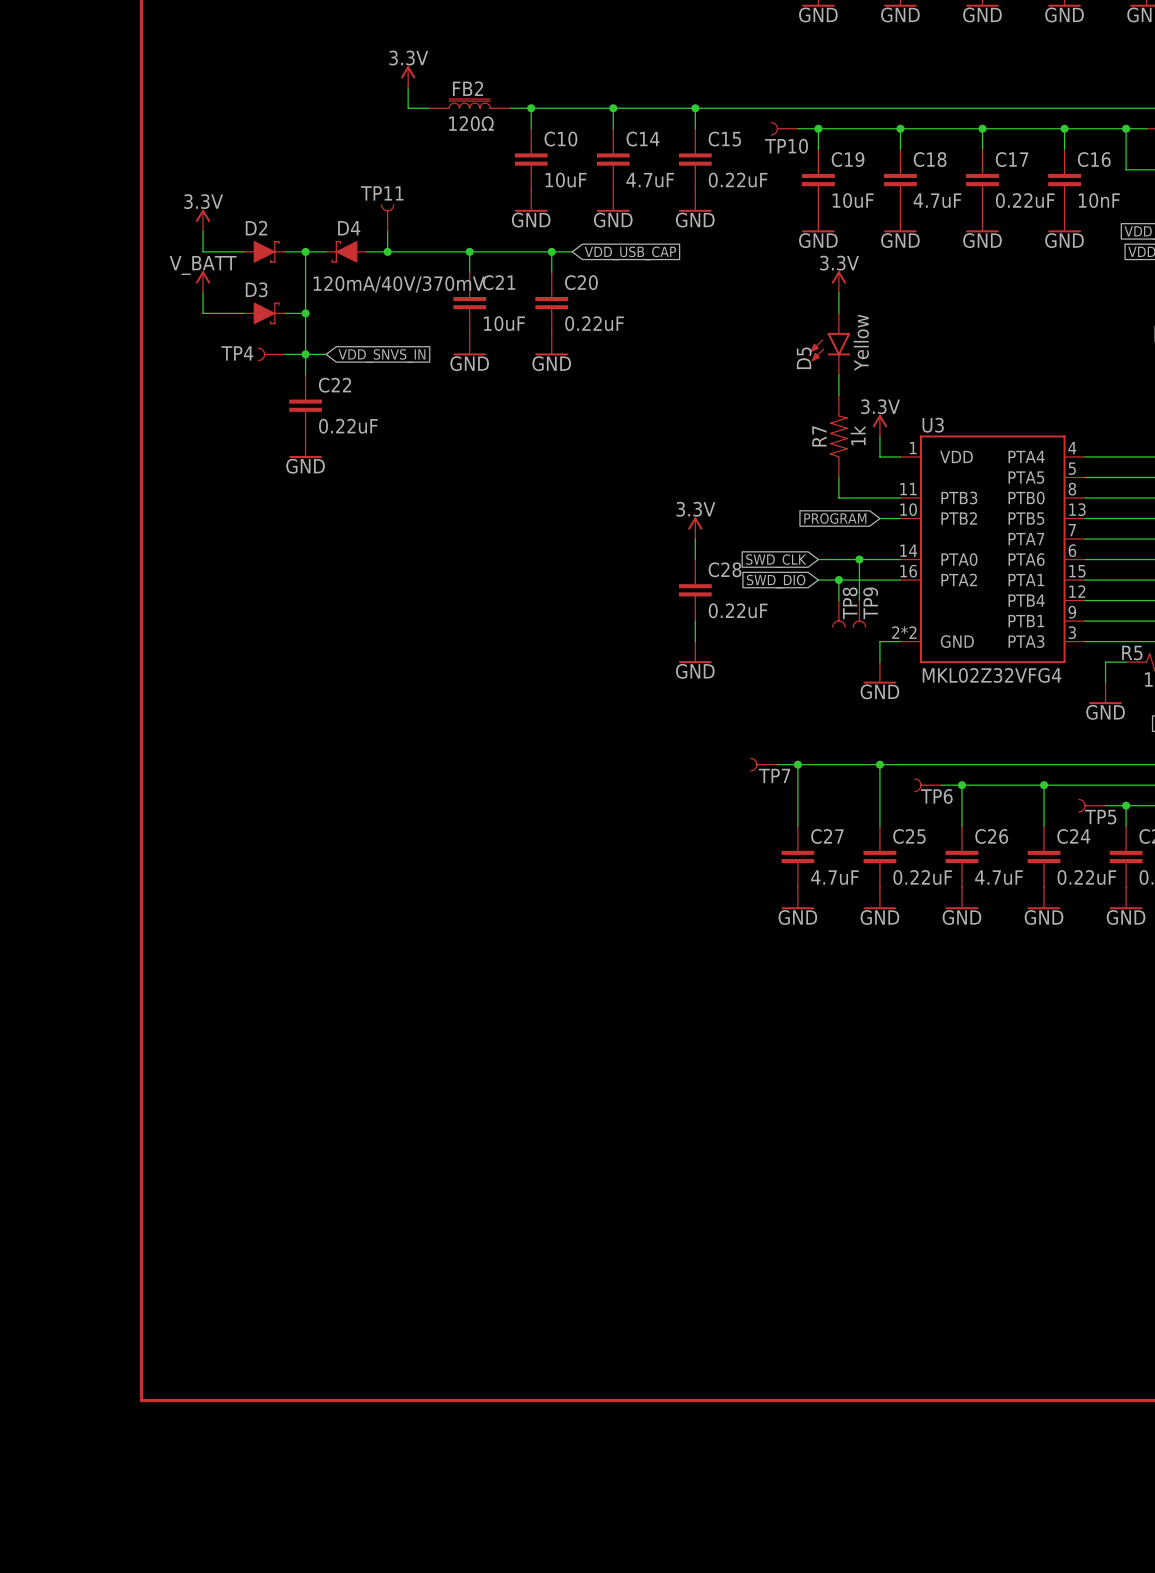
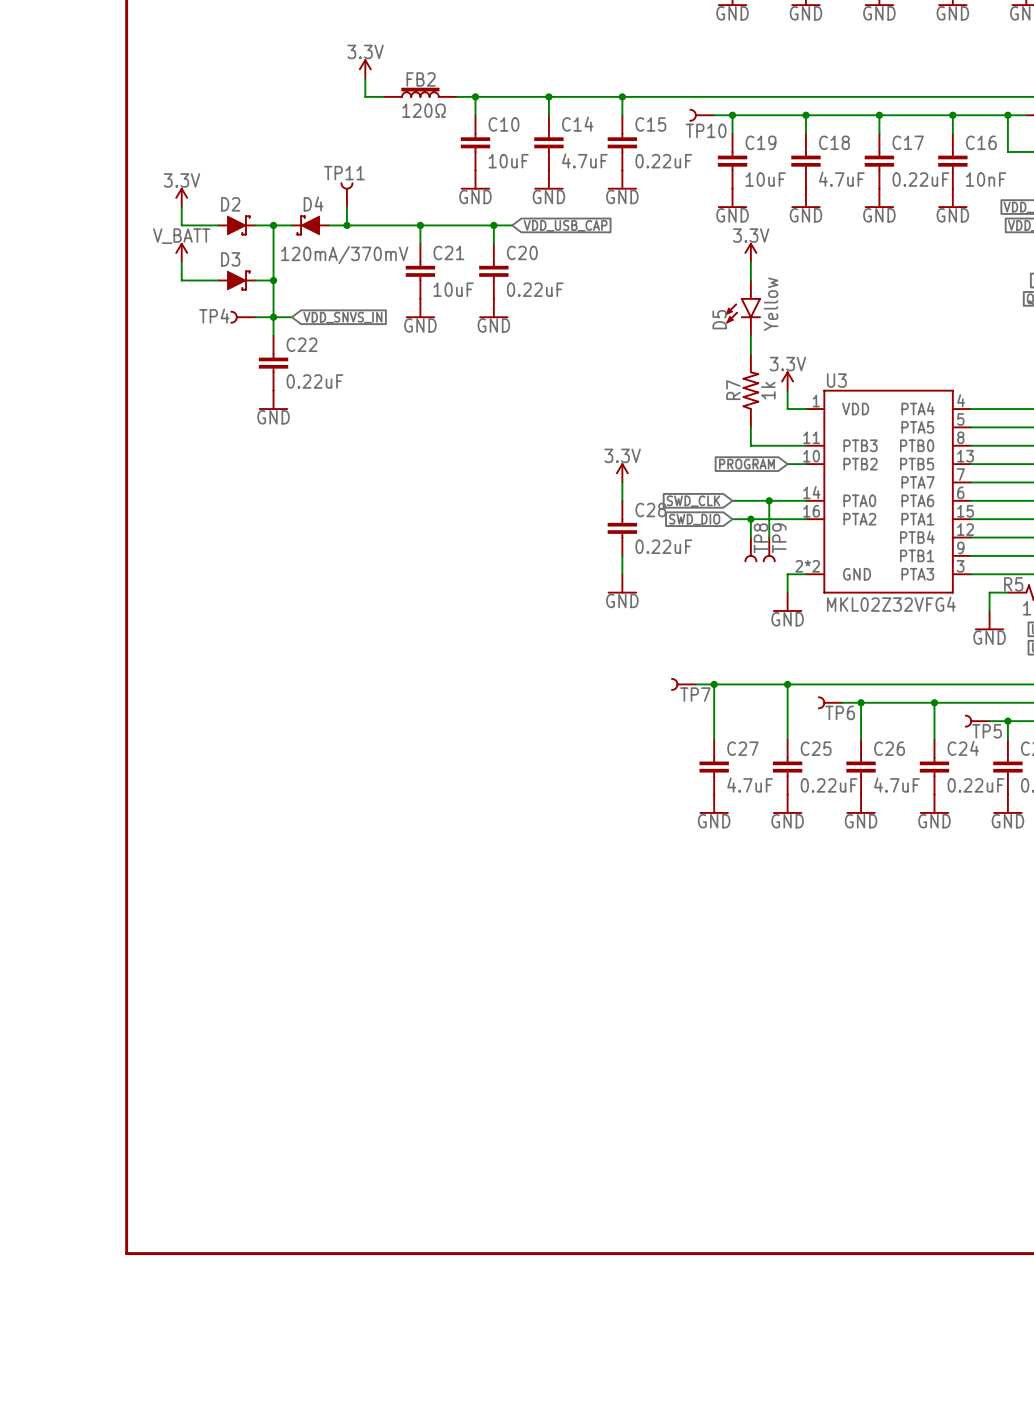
D3 value: 120mA/40V/370mV (399, 284) -> 120mA/370mV (344, 255)

